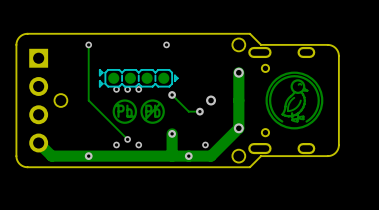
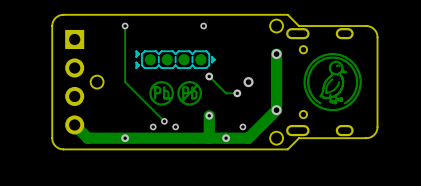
via: (116, 89) -> none
via: (127, 89) -> none
via: (138, 89) -> none

